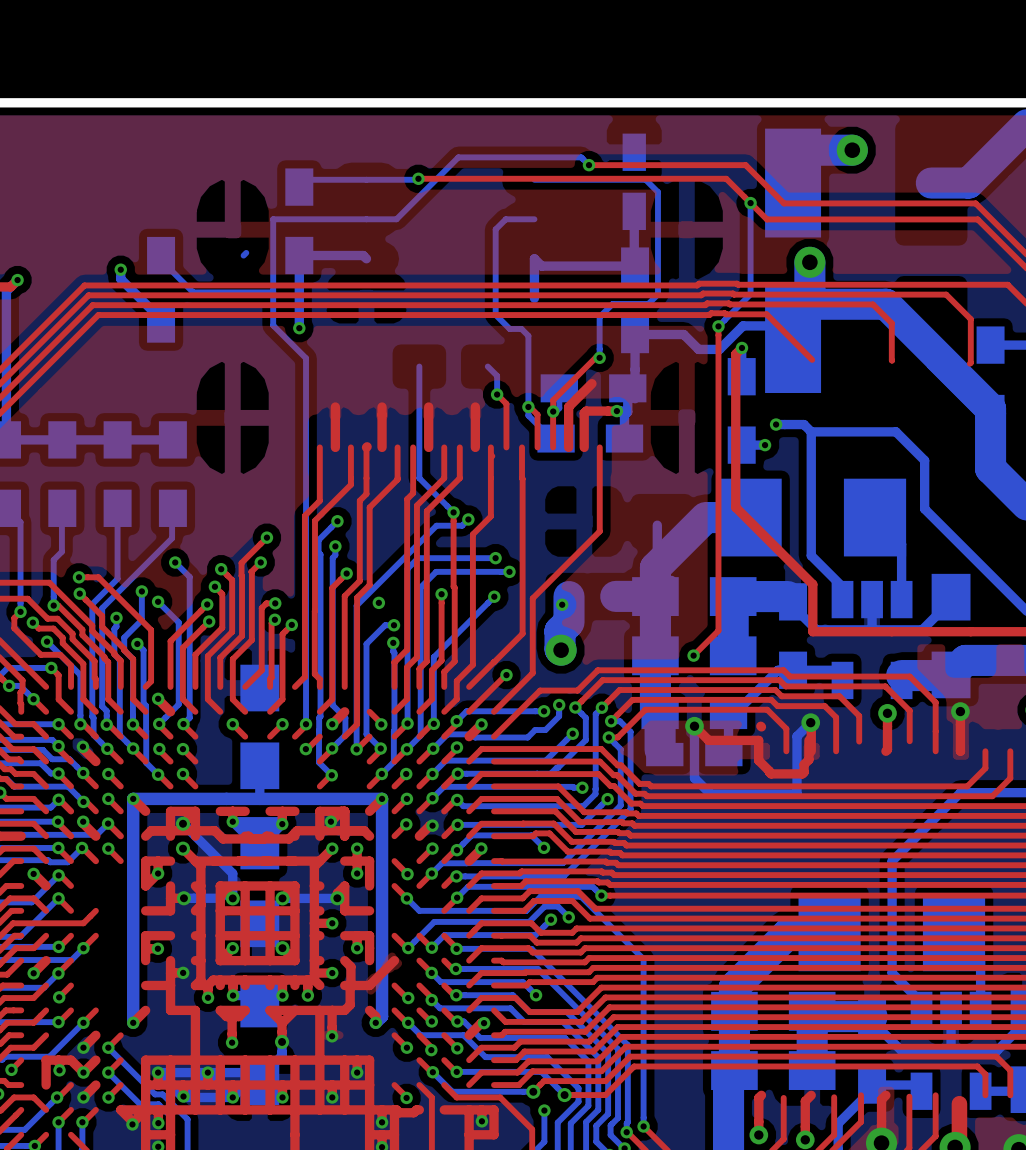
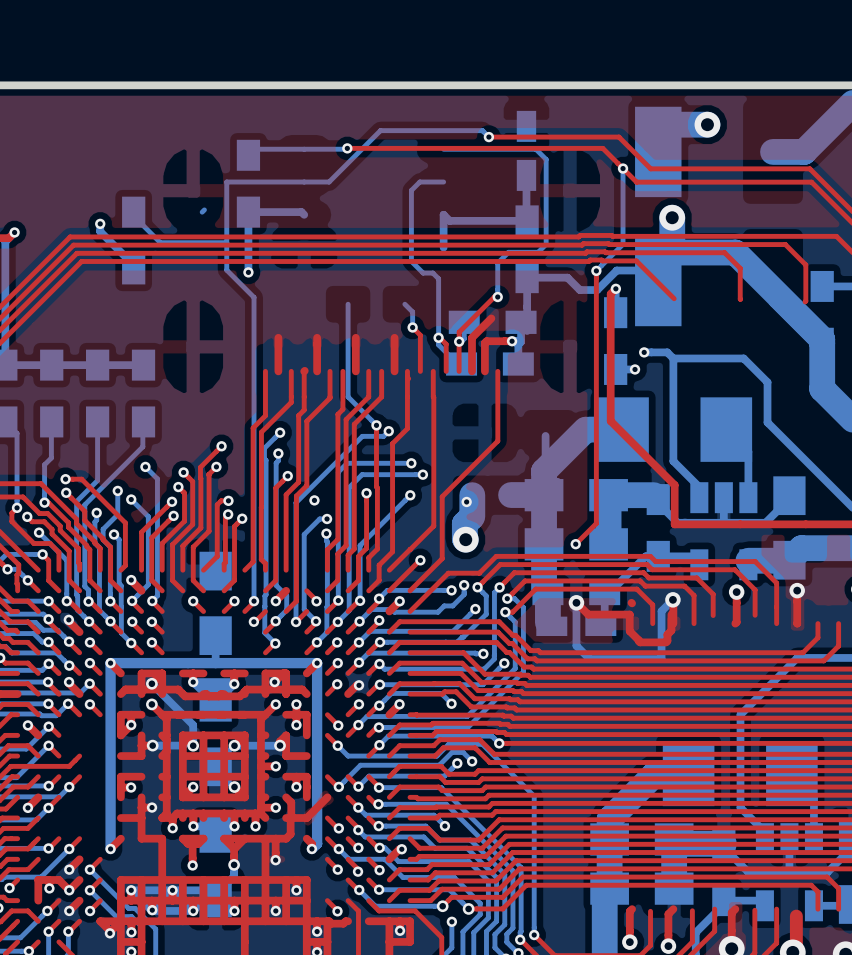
top track: (71, 985) (59, 997) -> none
via: (59, 997) -> none

